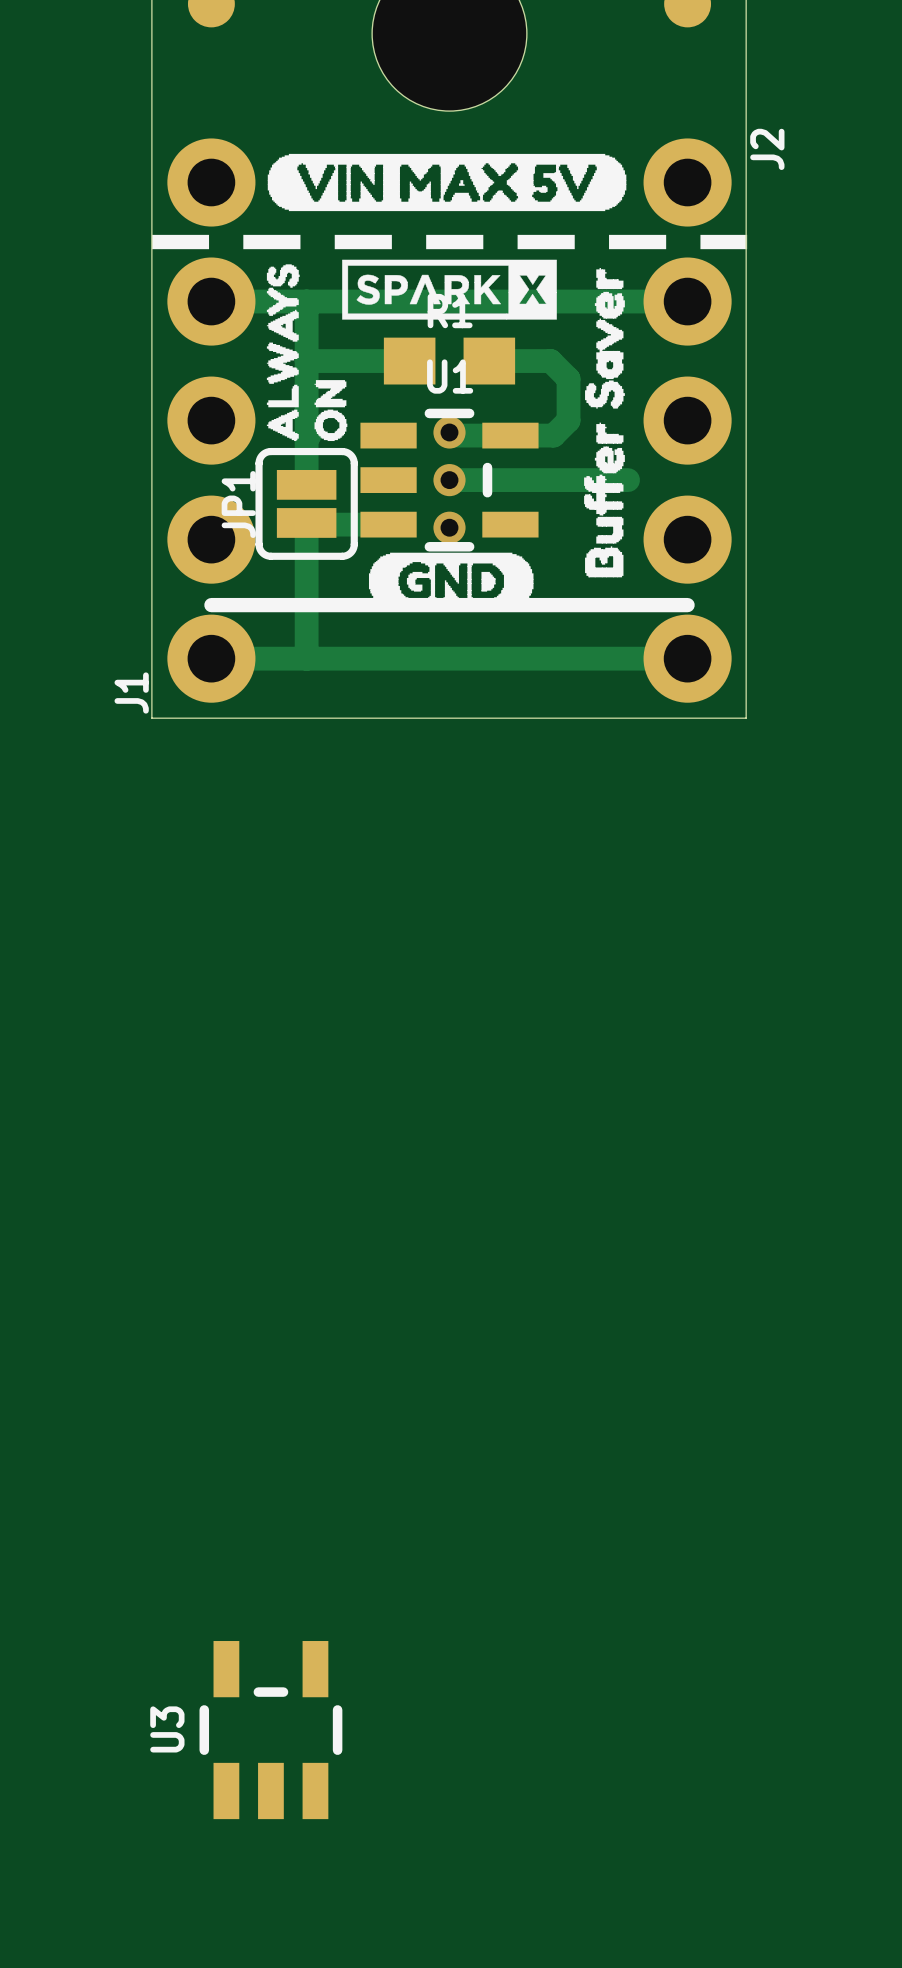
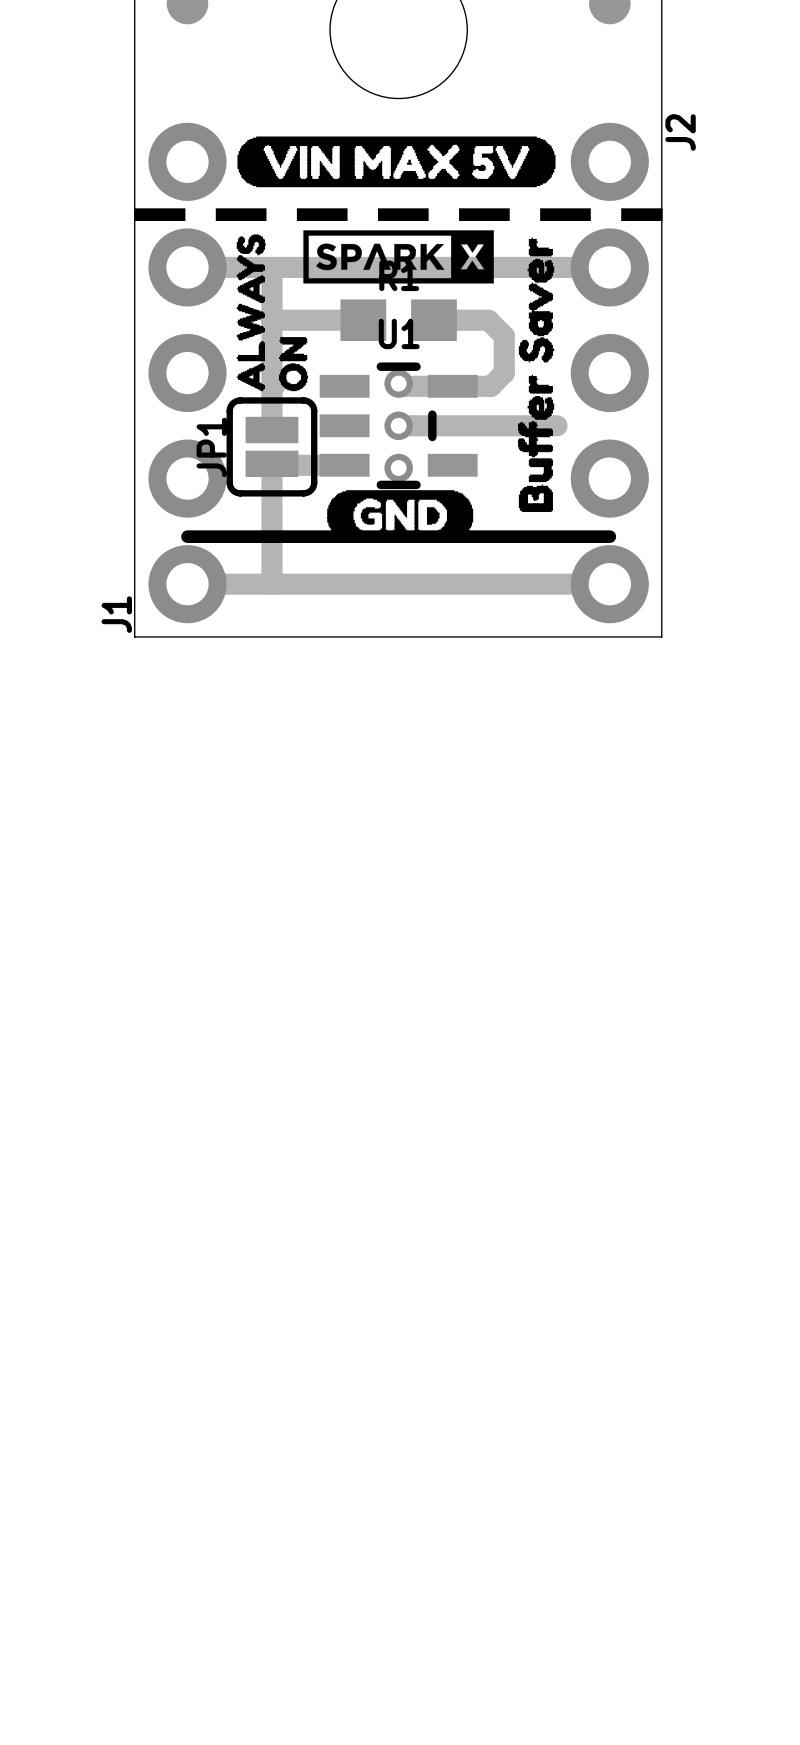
U3: (270, 1730) -> none

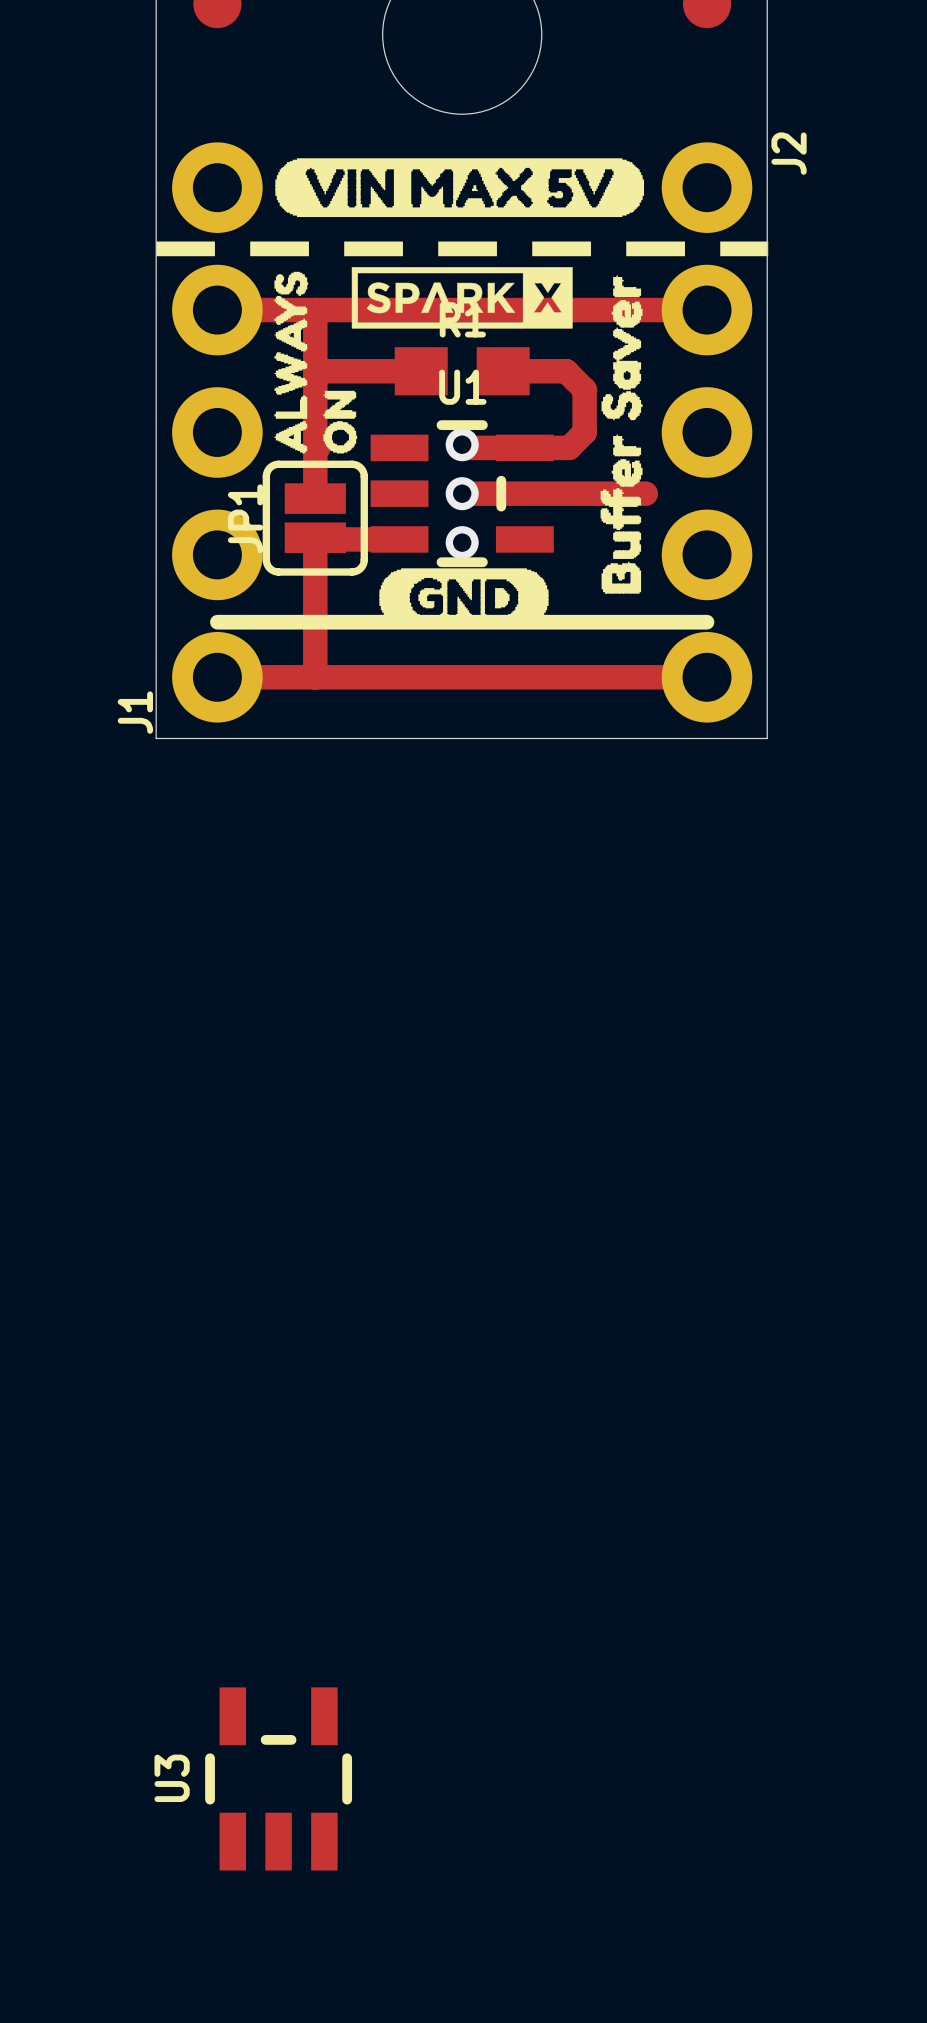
U3: none -> (278, 1778)

